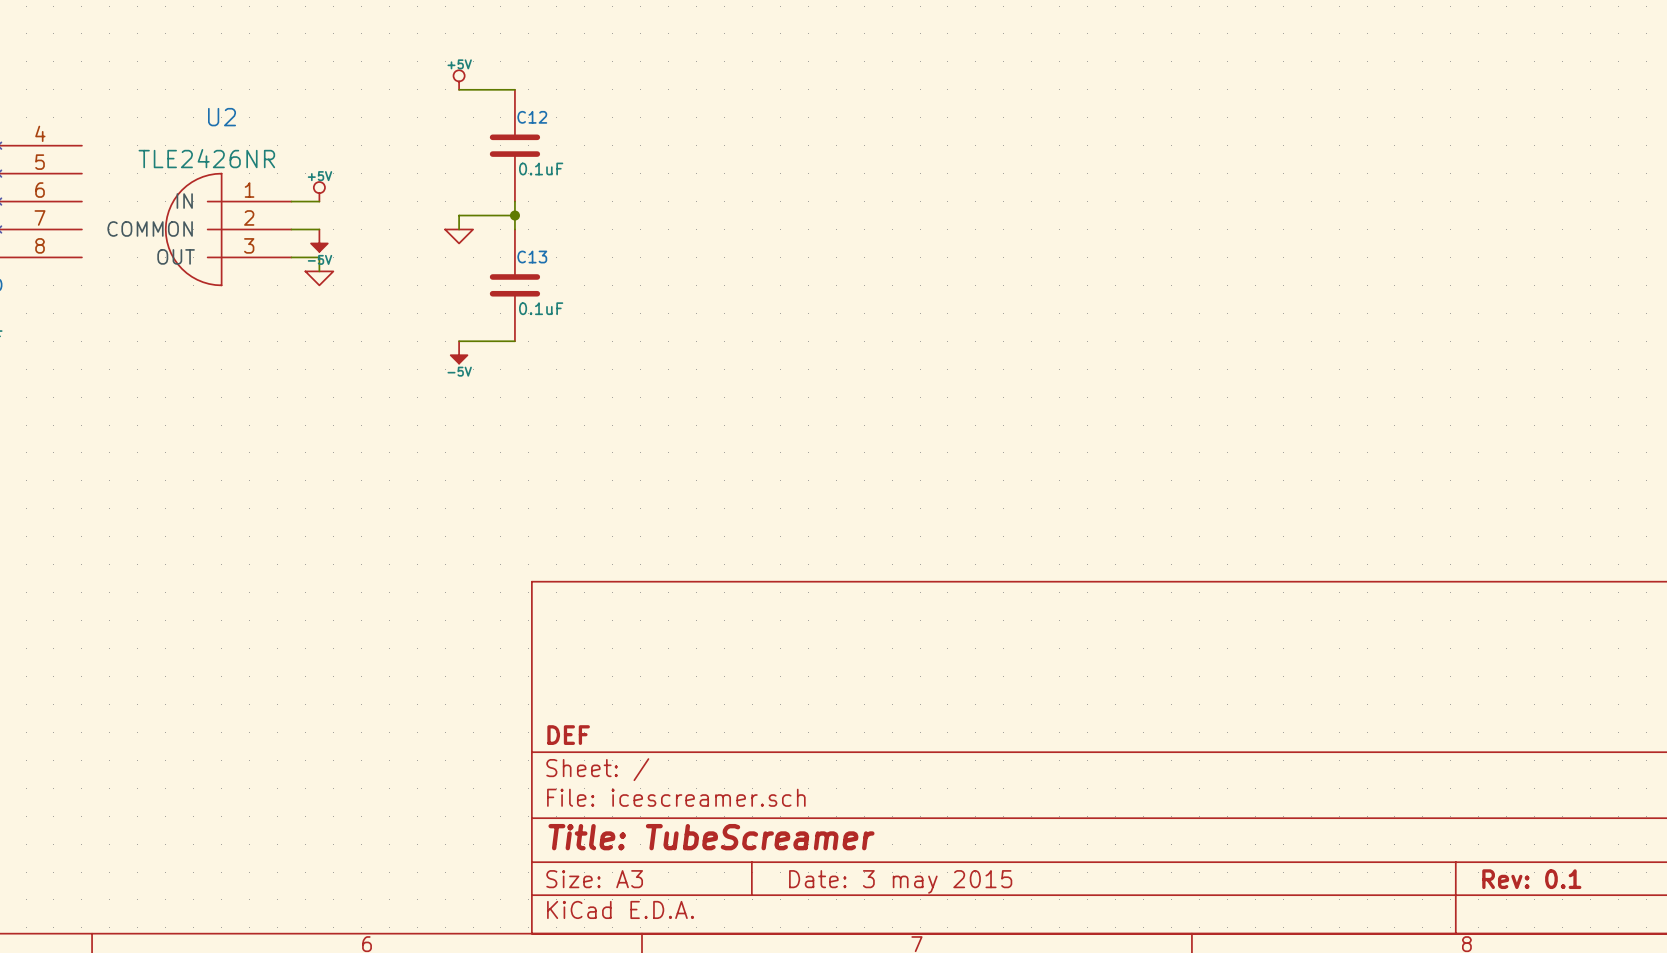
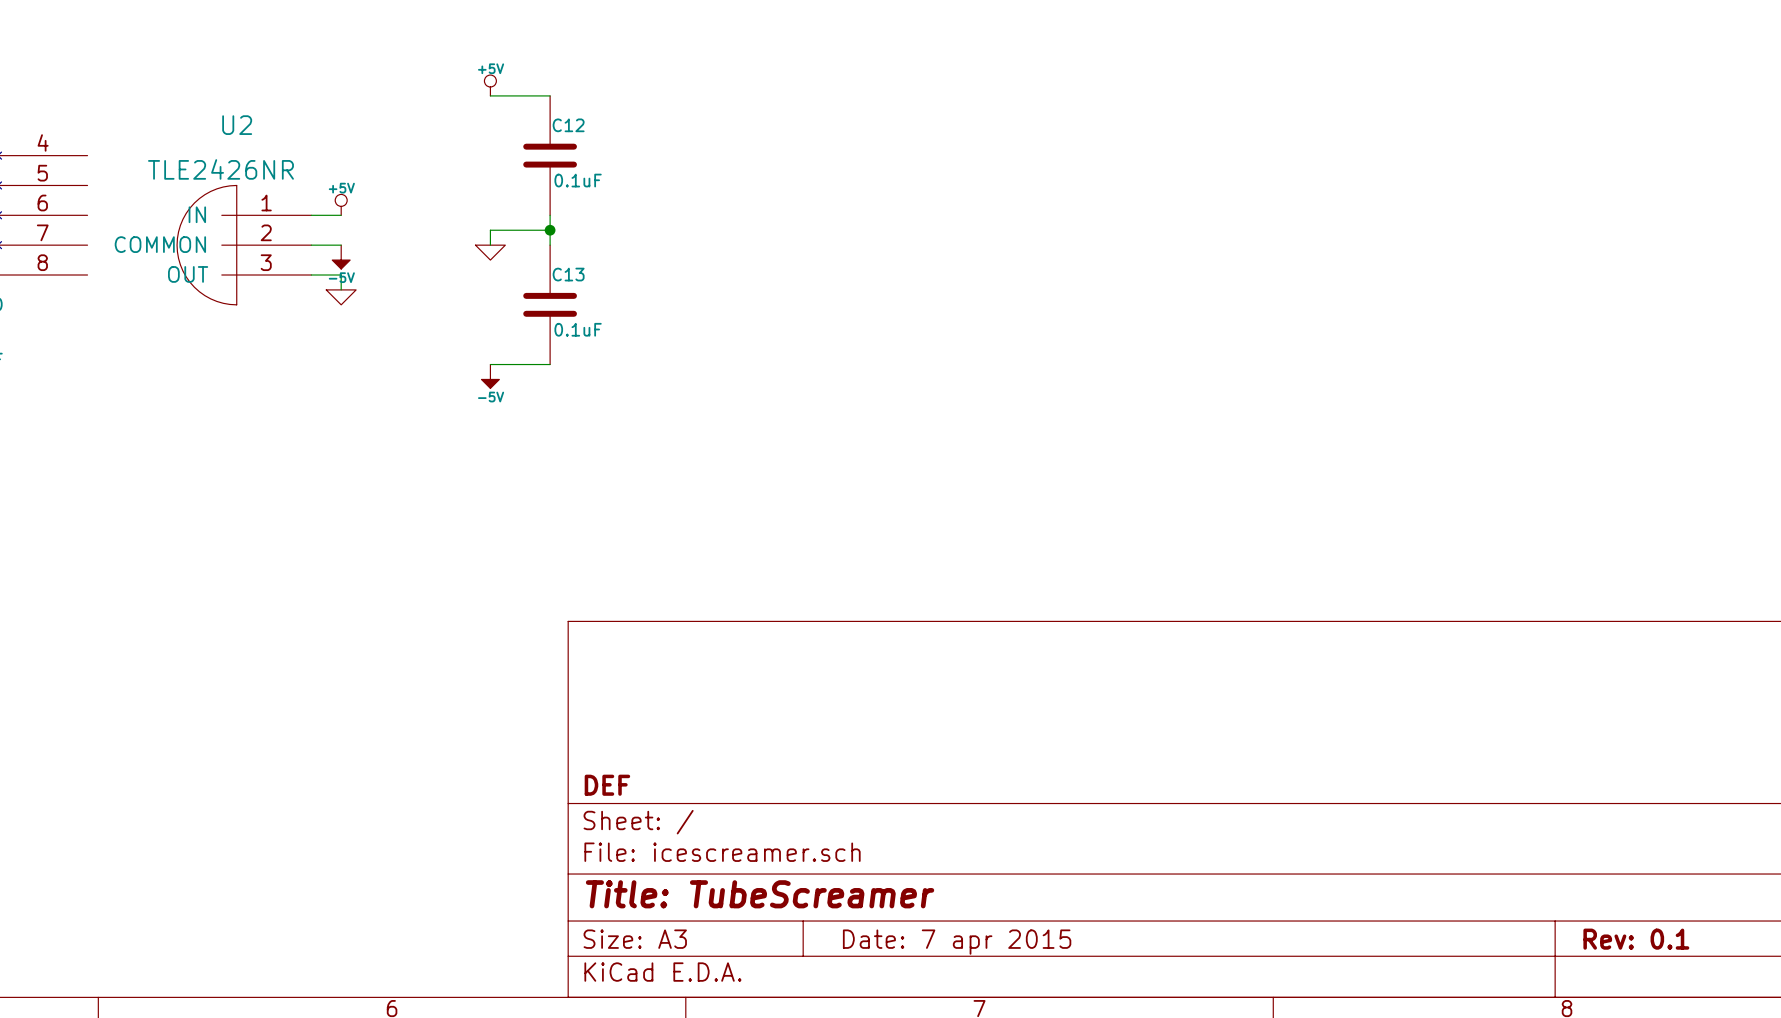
title block: Date: 3 may 2015 (900, 881) -> Date: 7 apr 2015 (957, 942)

